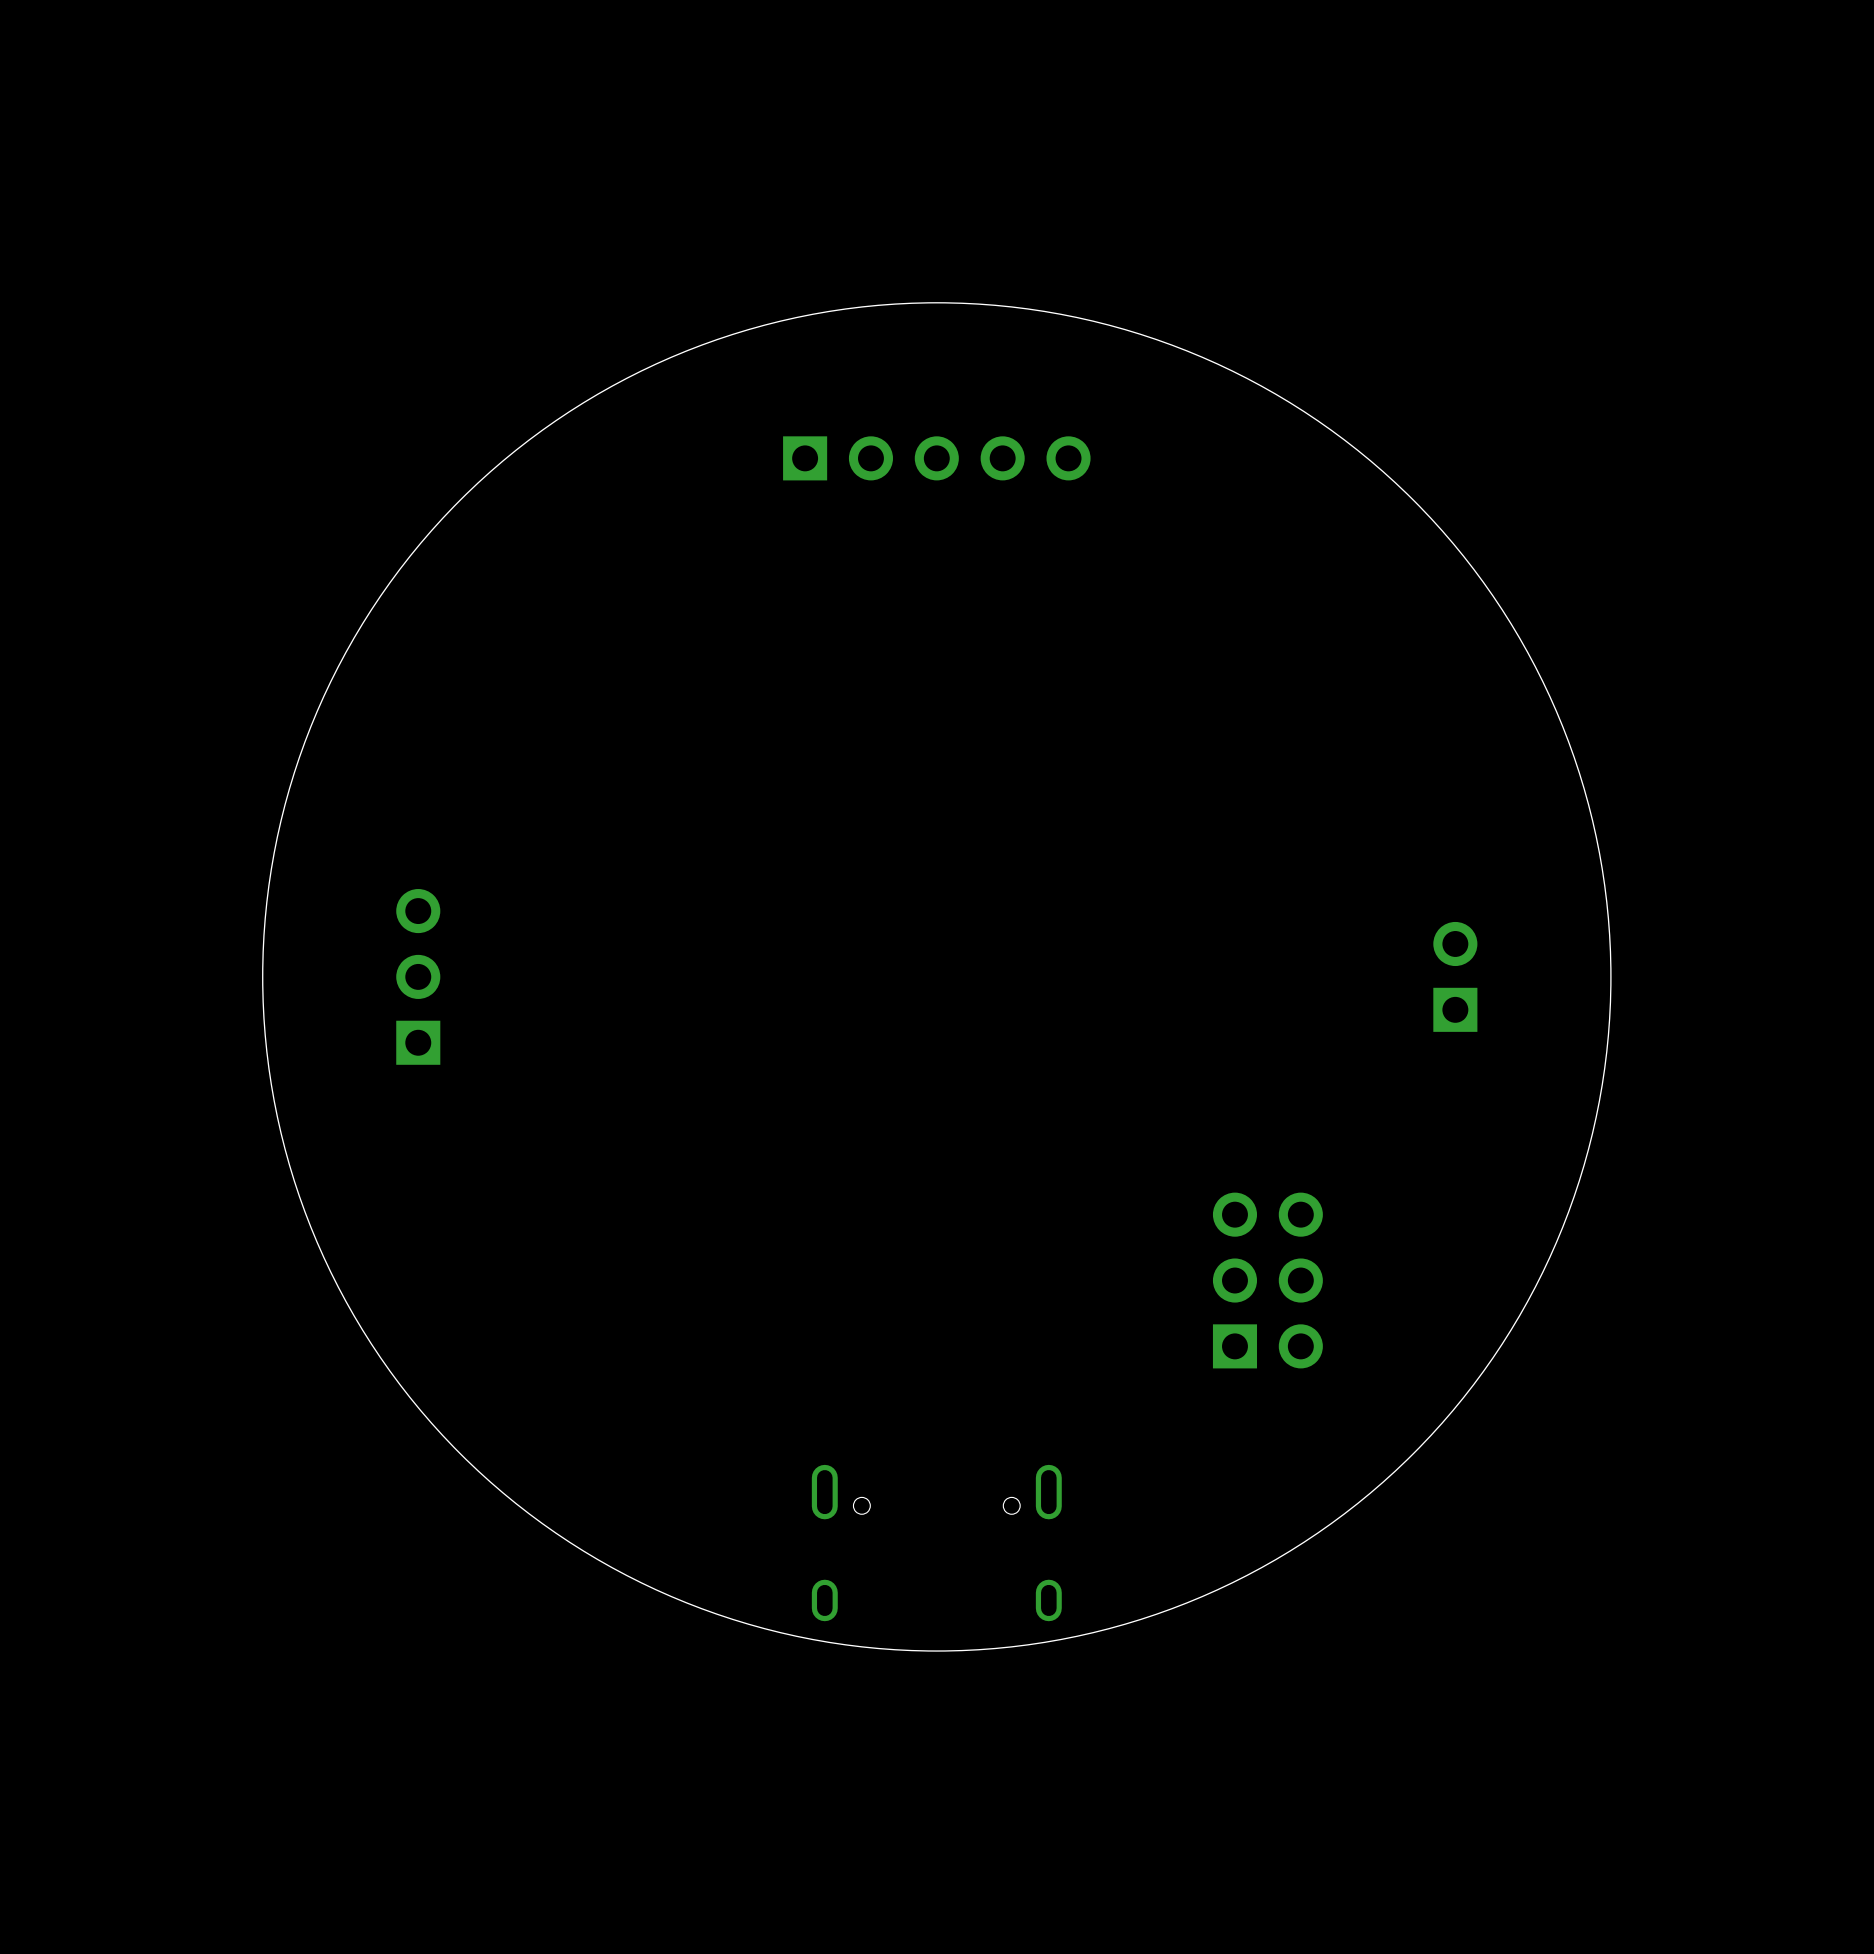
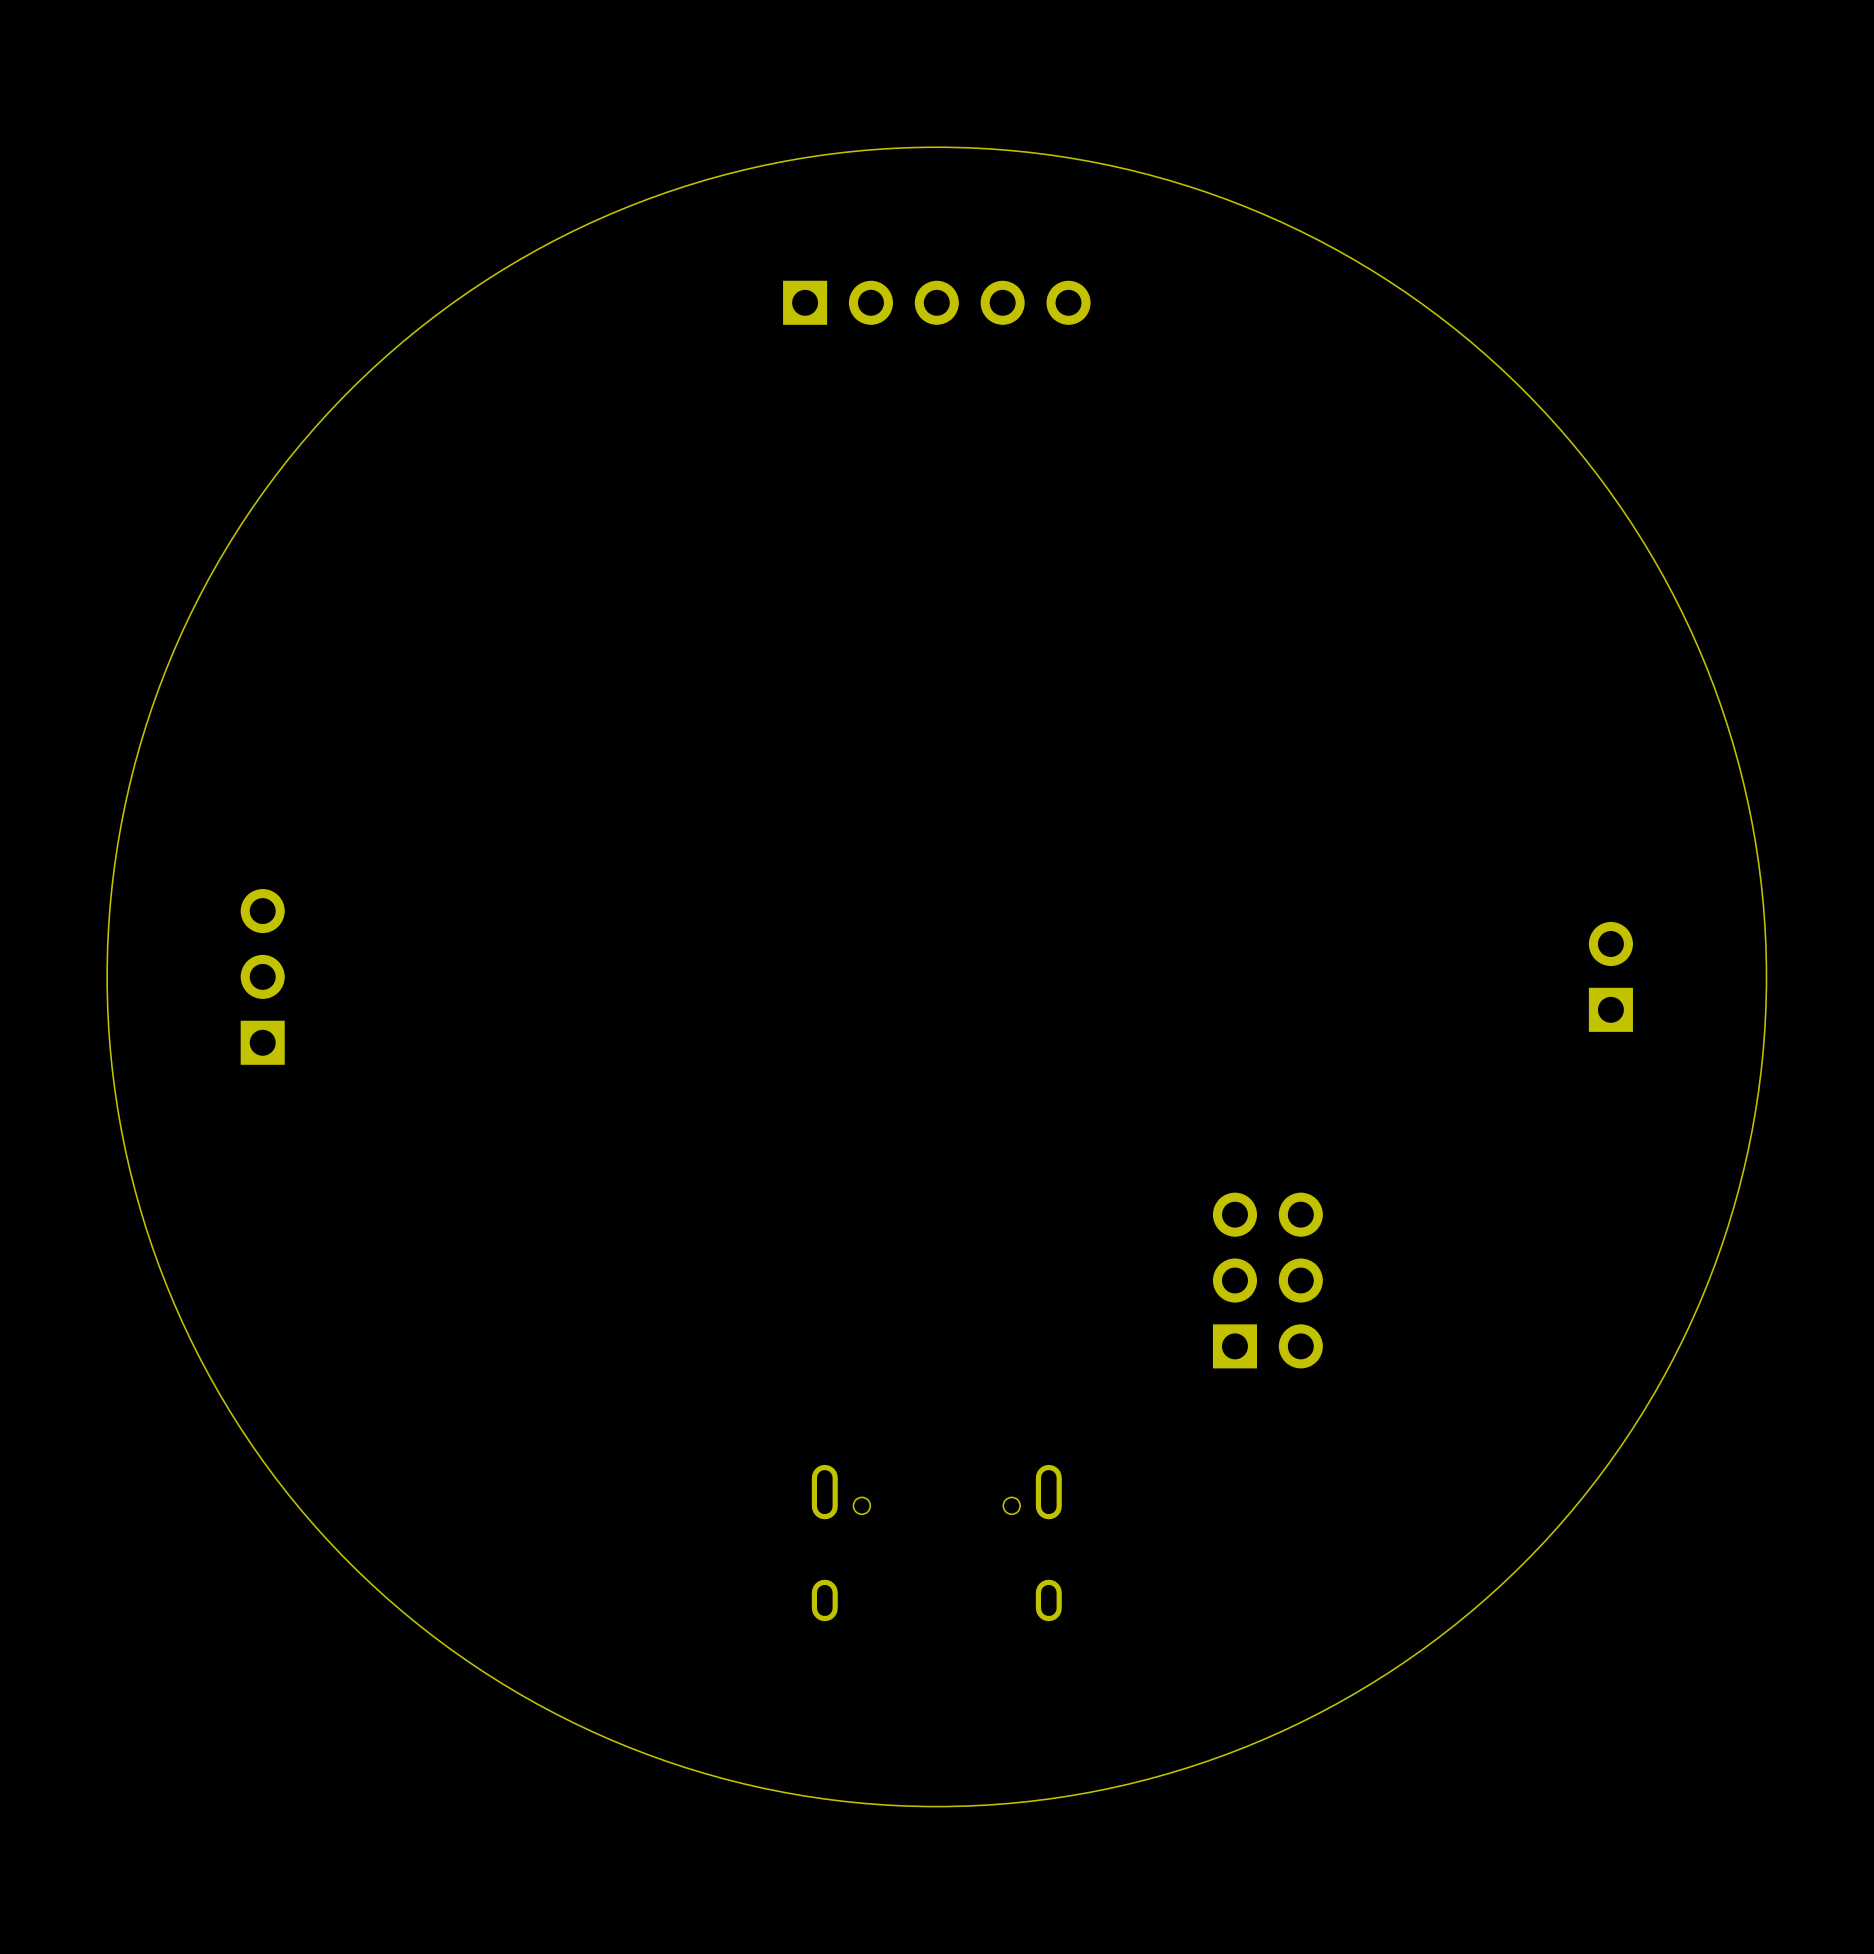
round board edge size: [262, 302, 1612, 1652] -> [106, 146, 1768, 1808]
part position: (936, 458) -> (936, 302)
part position: (418, 976) -> (262, 976)
part position: (1455, 976) -> (1610, 976)

